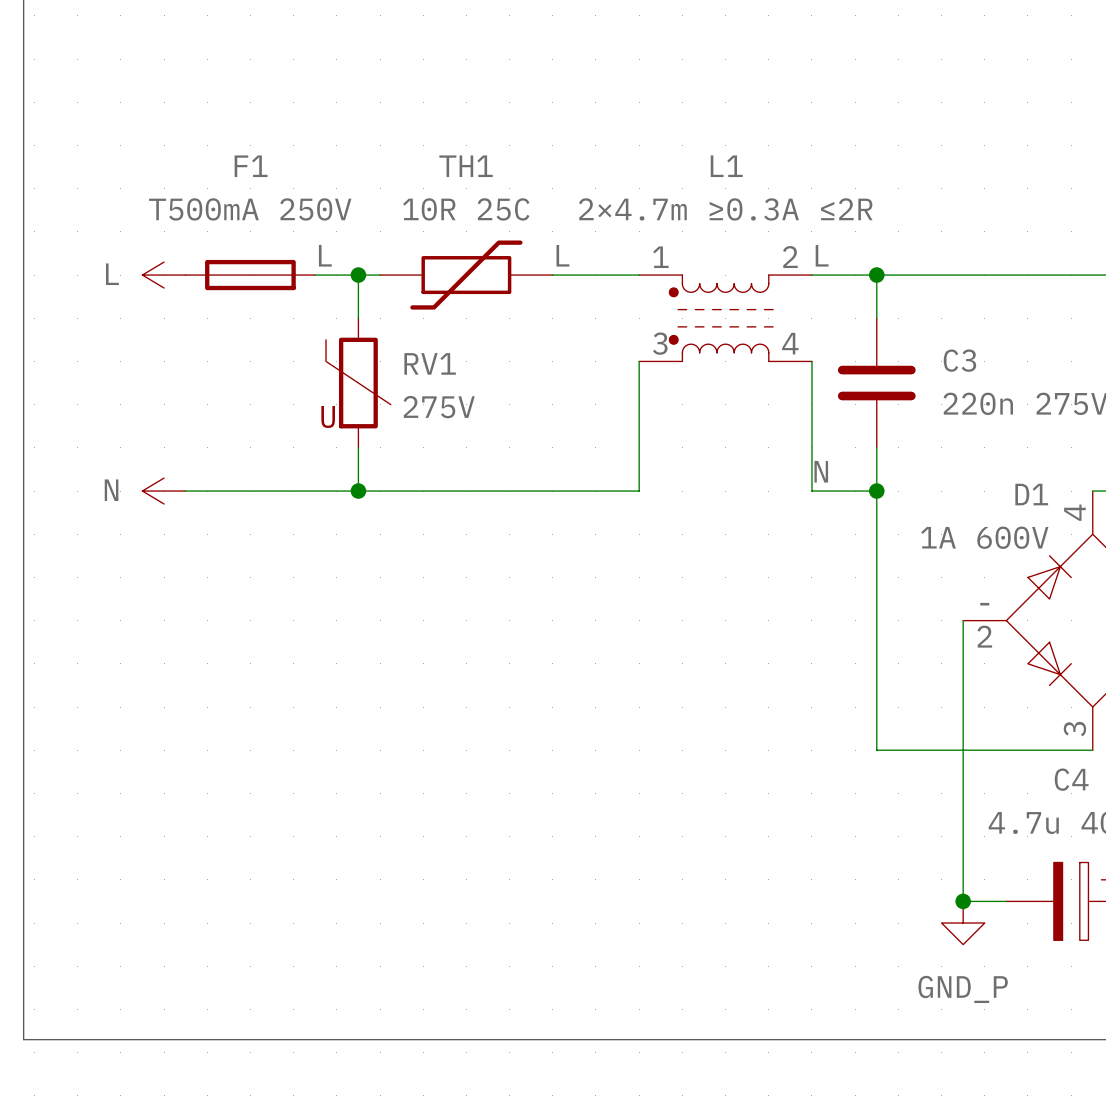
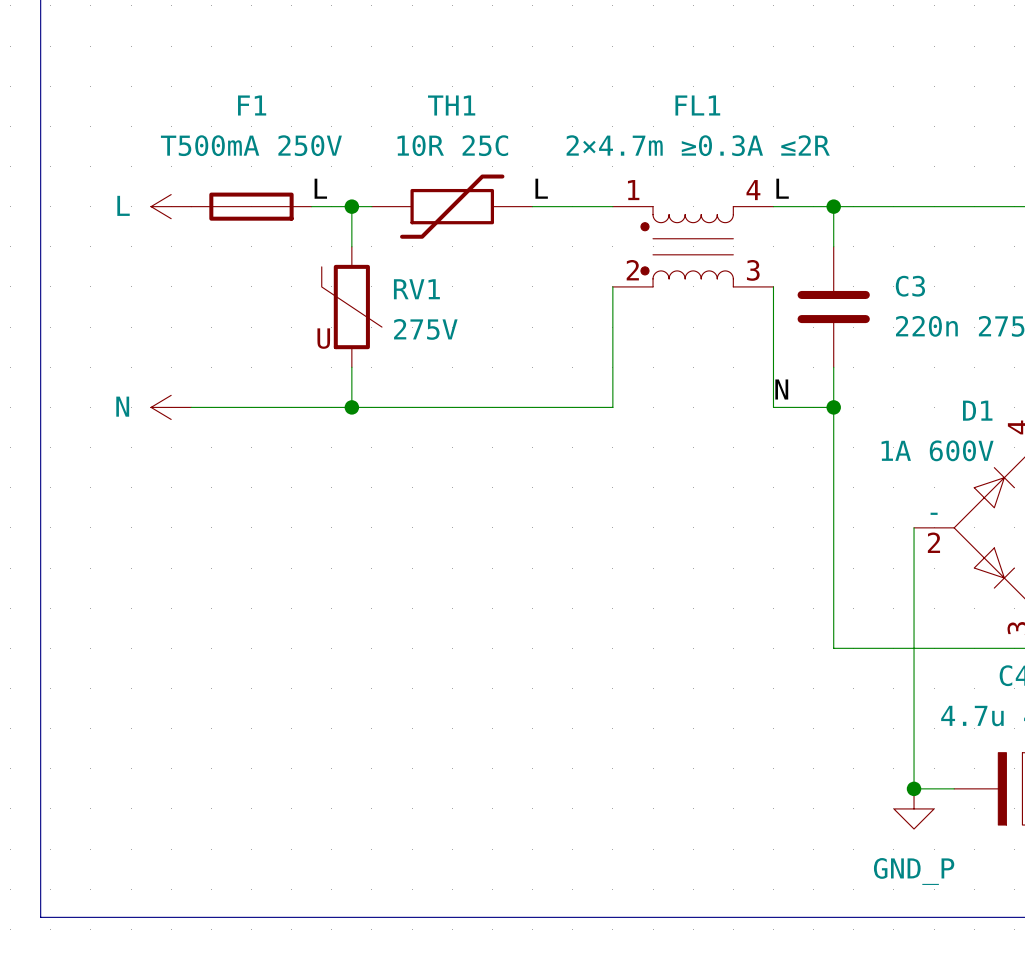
L1: 2×4.7m ≥0.3A ≤2R (725, 318) -> none
FL1: none -> 2×4.7m ≥0.3A ≤2R (693, 246)

